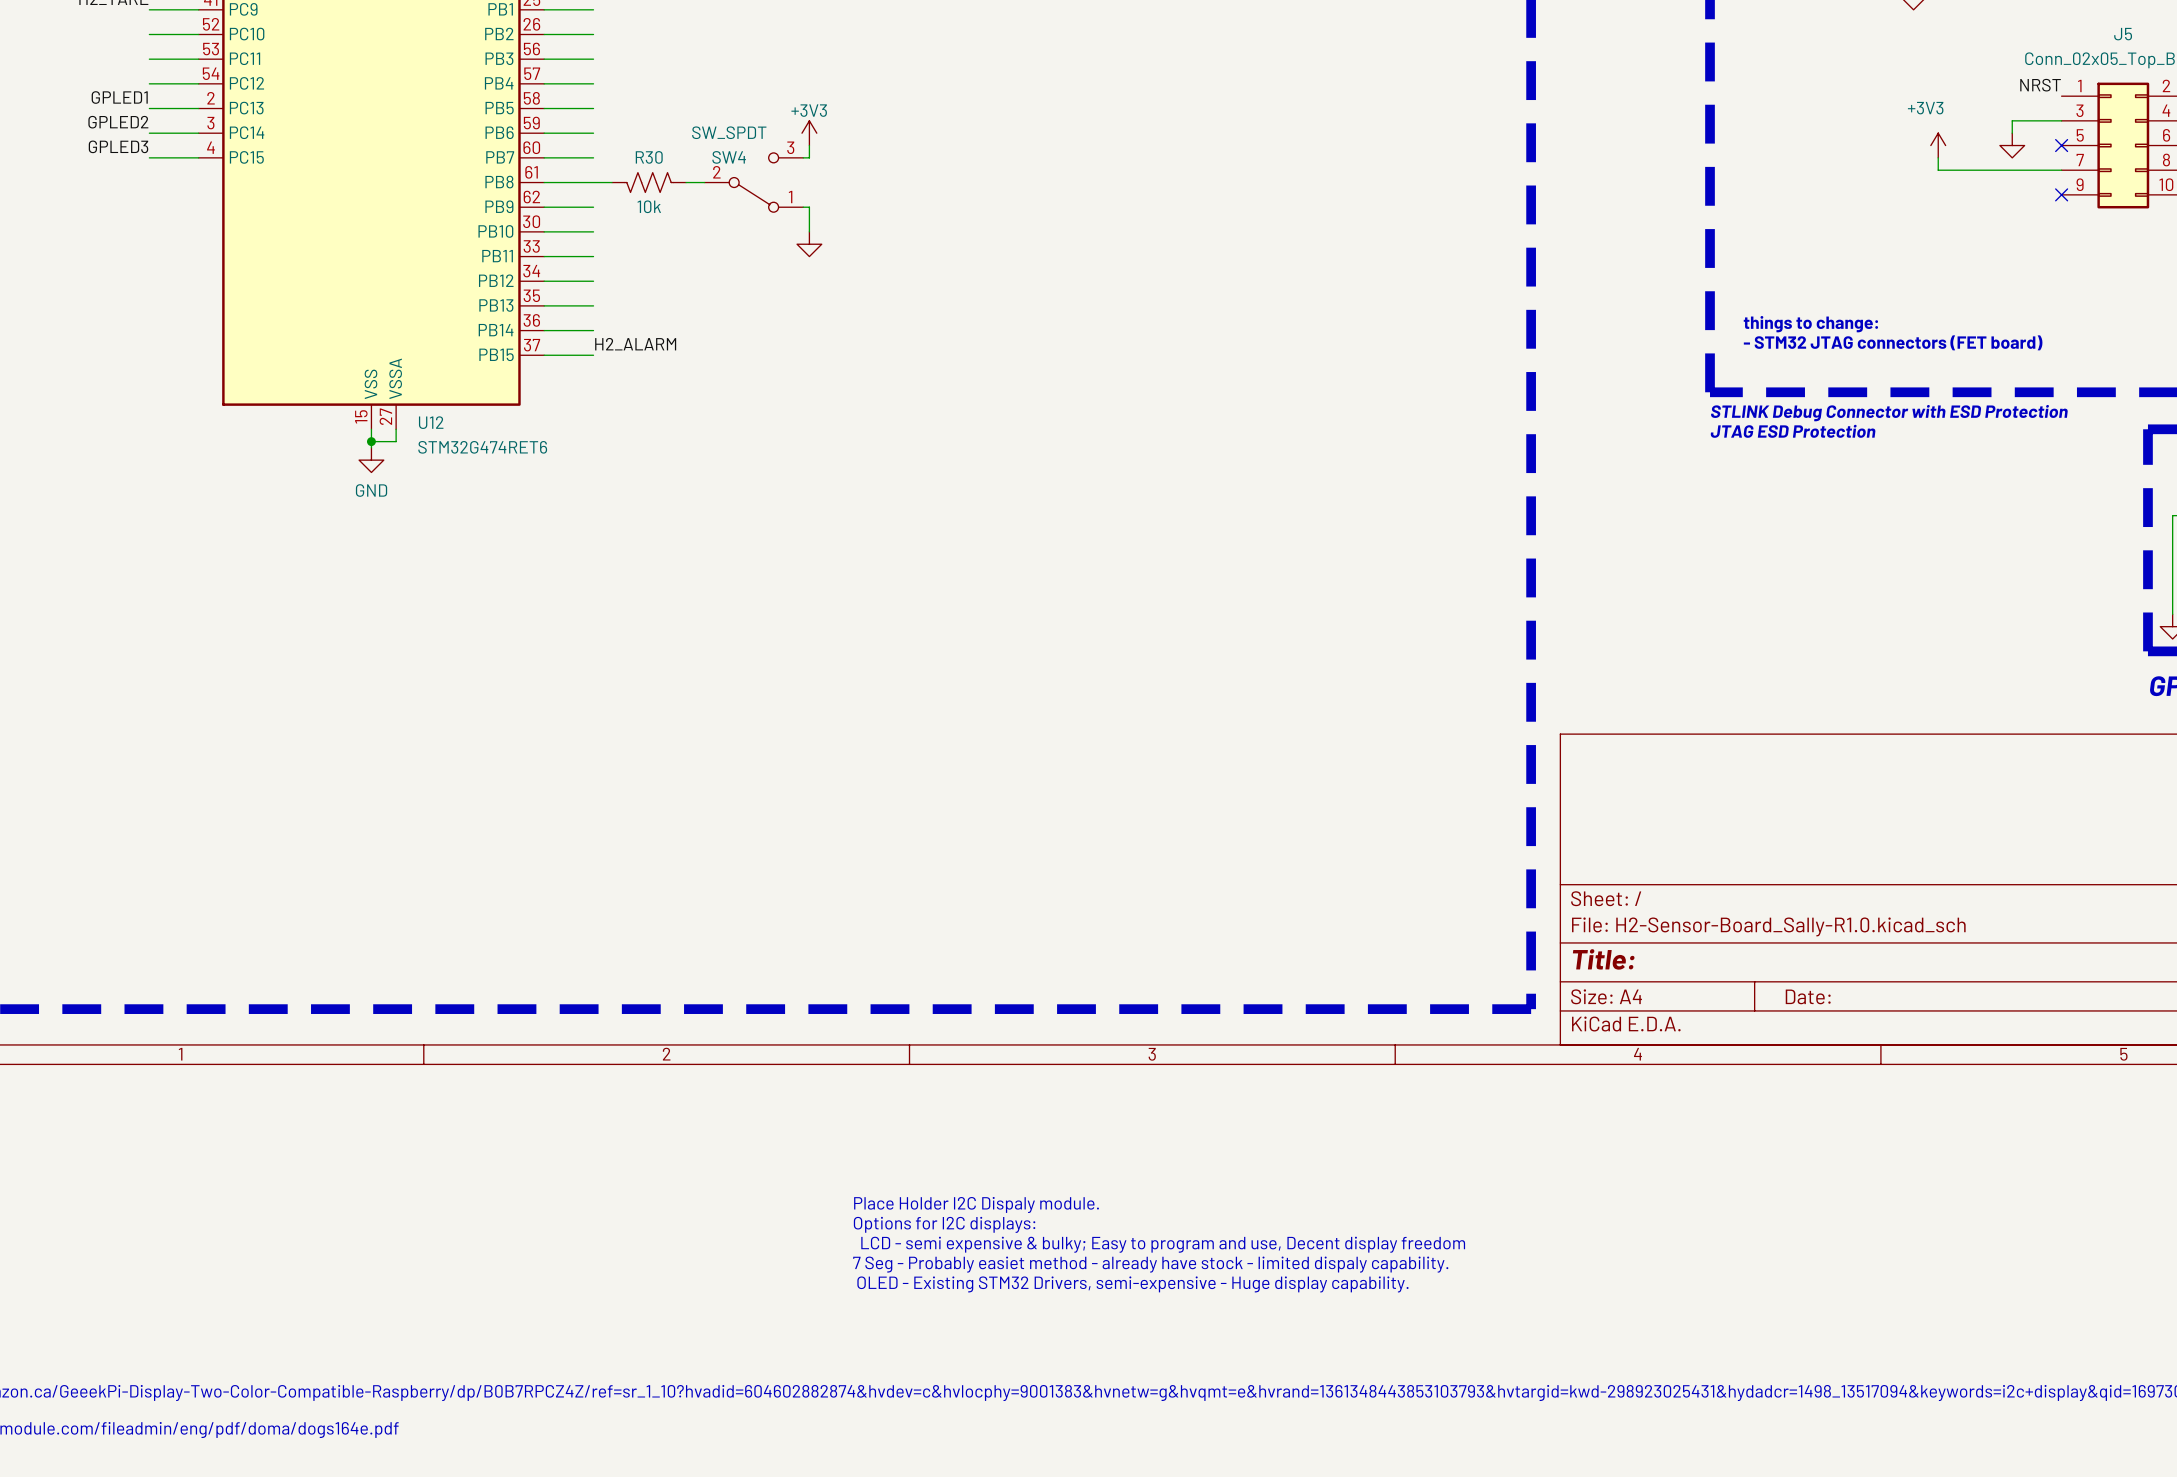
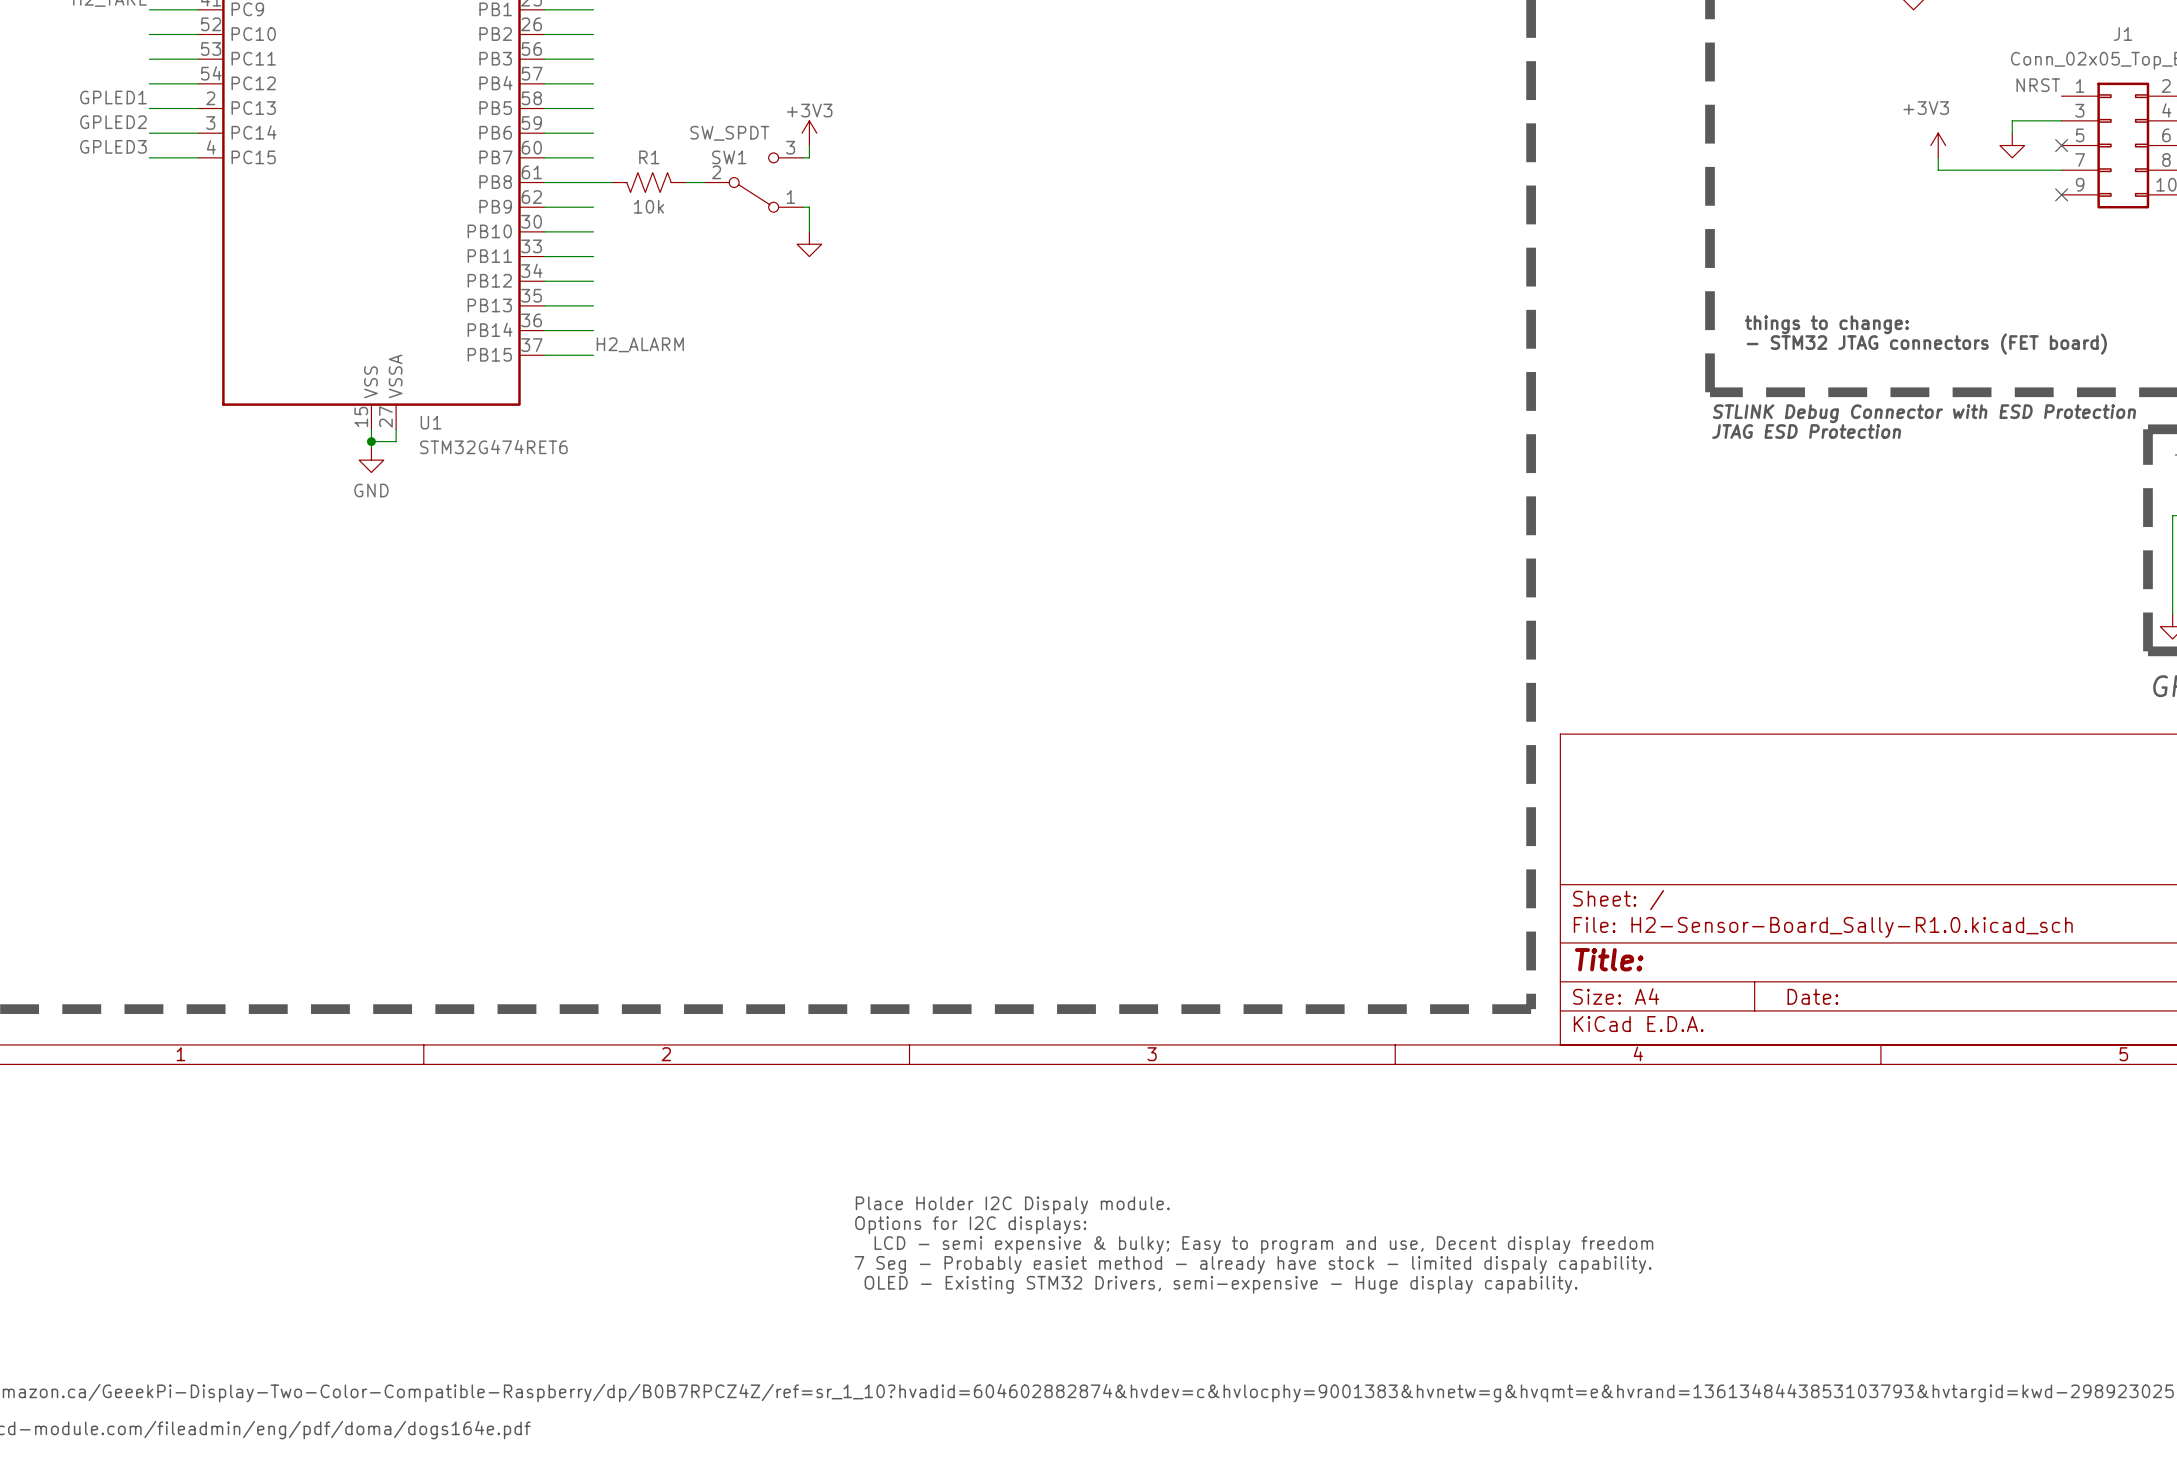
J5 name: J5 (2123, 34) -> J1 (2123, 34)
R30 name: R30 (649, 157) -> R1 (649, 157)
SW4 name: SW4 (729, 157) -> SW1 (729, 157)
U12 name: U12 (431, 422) -> U1 (431, 422)

